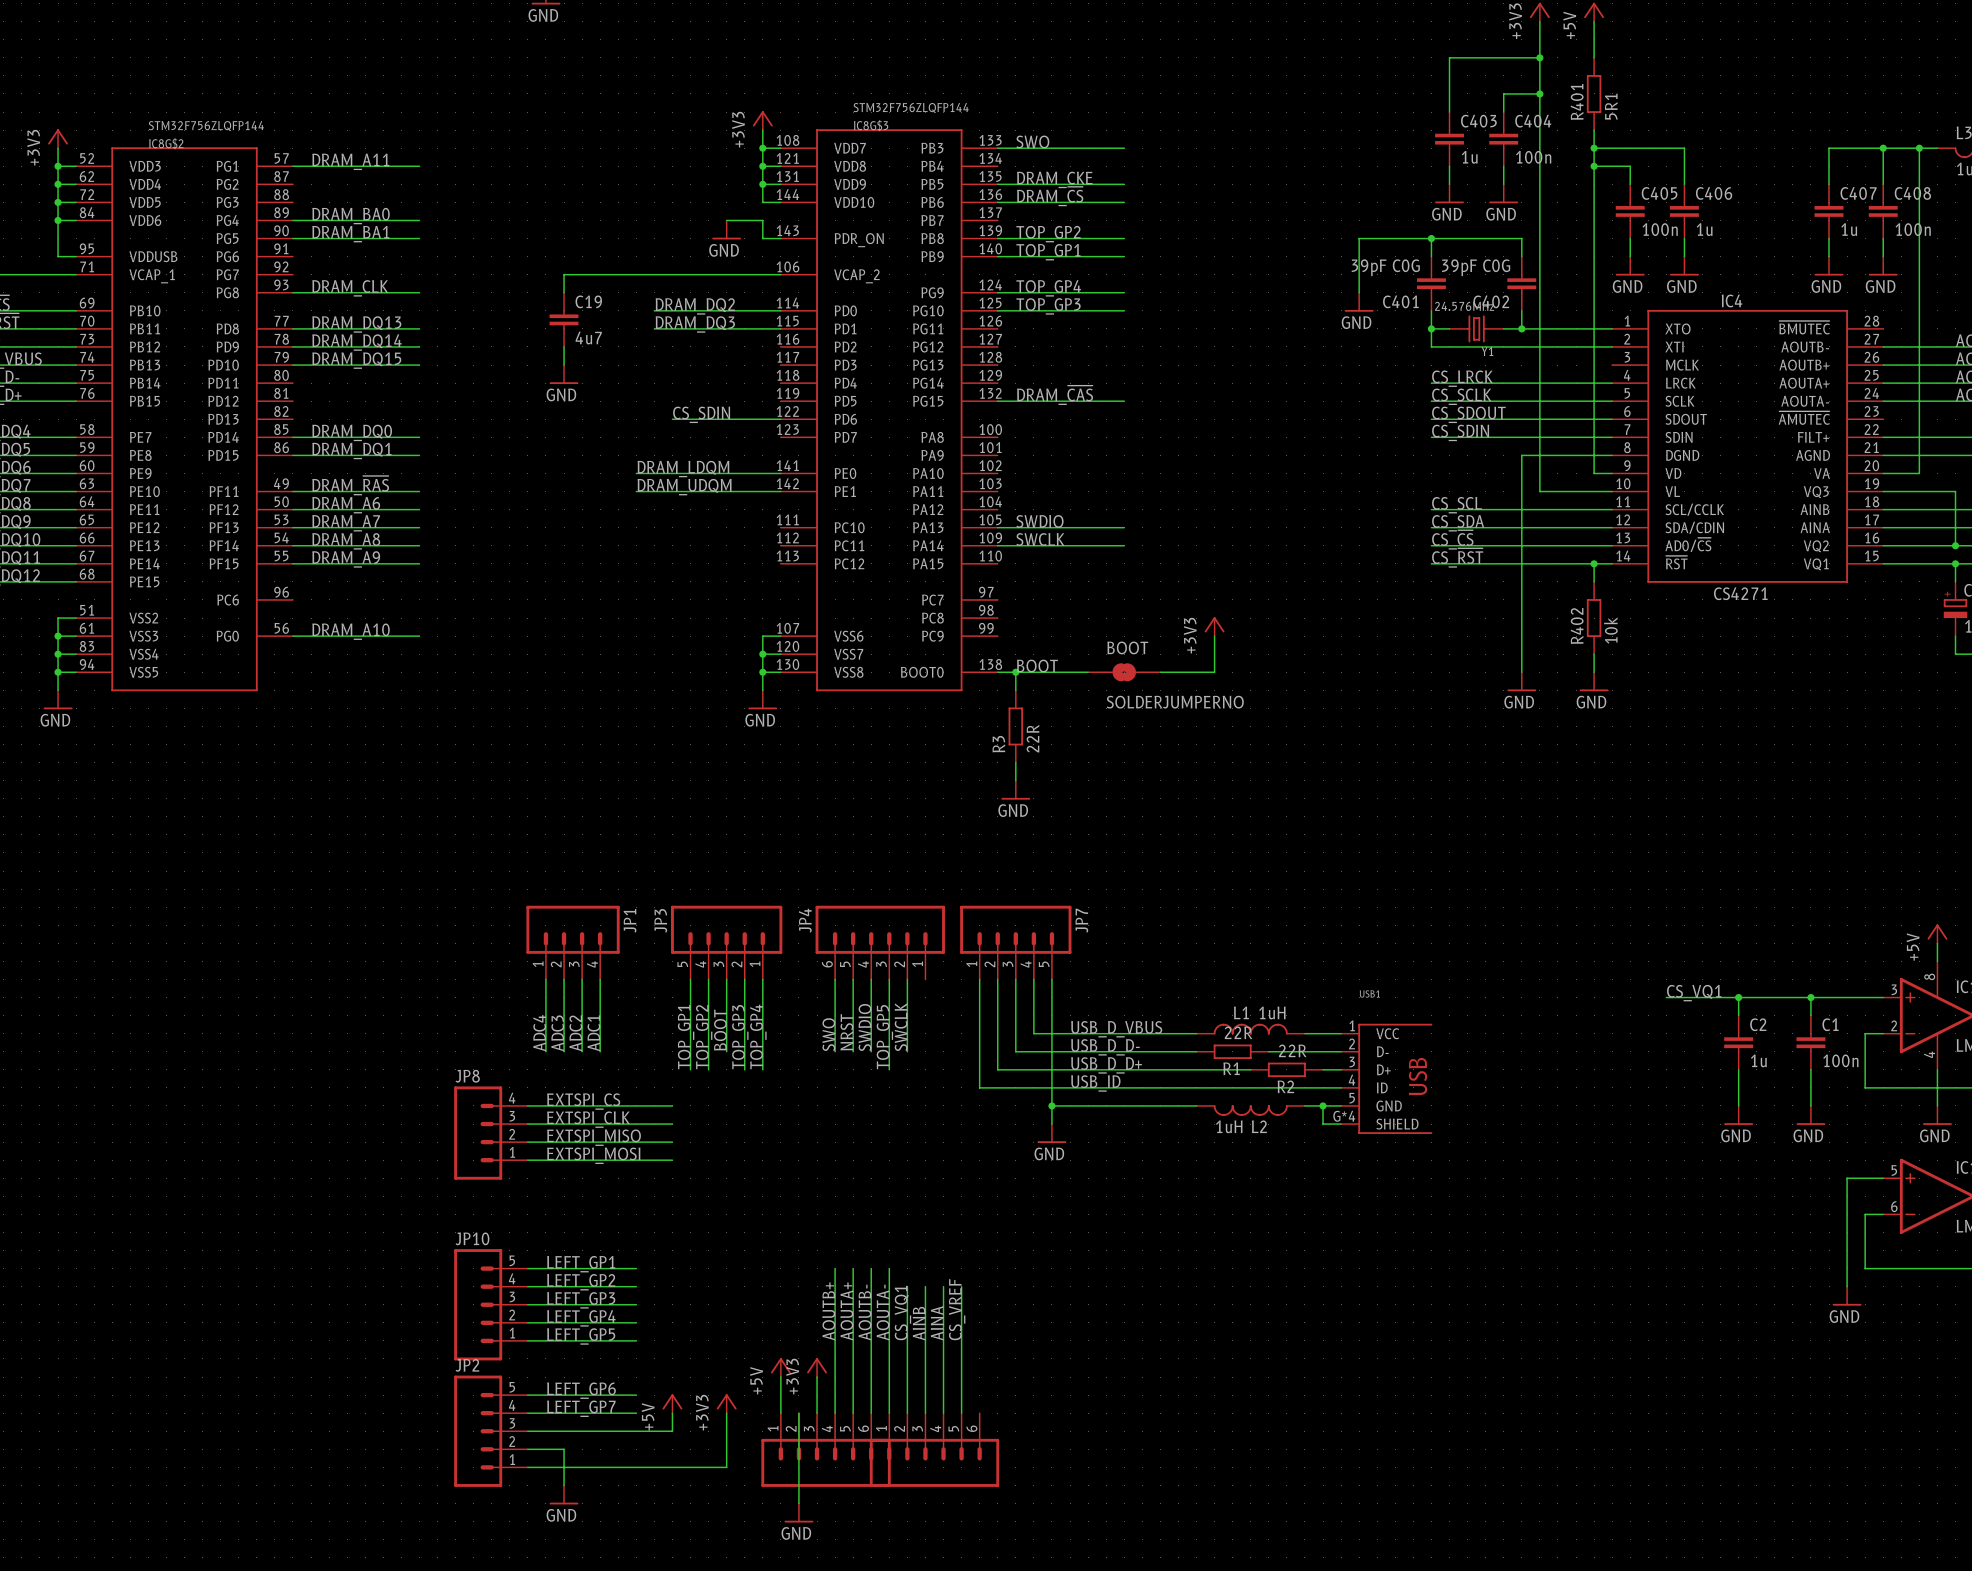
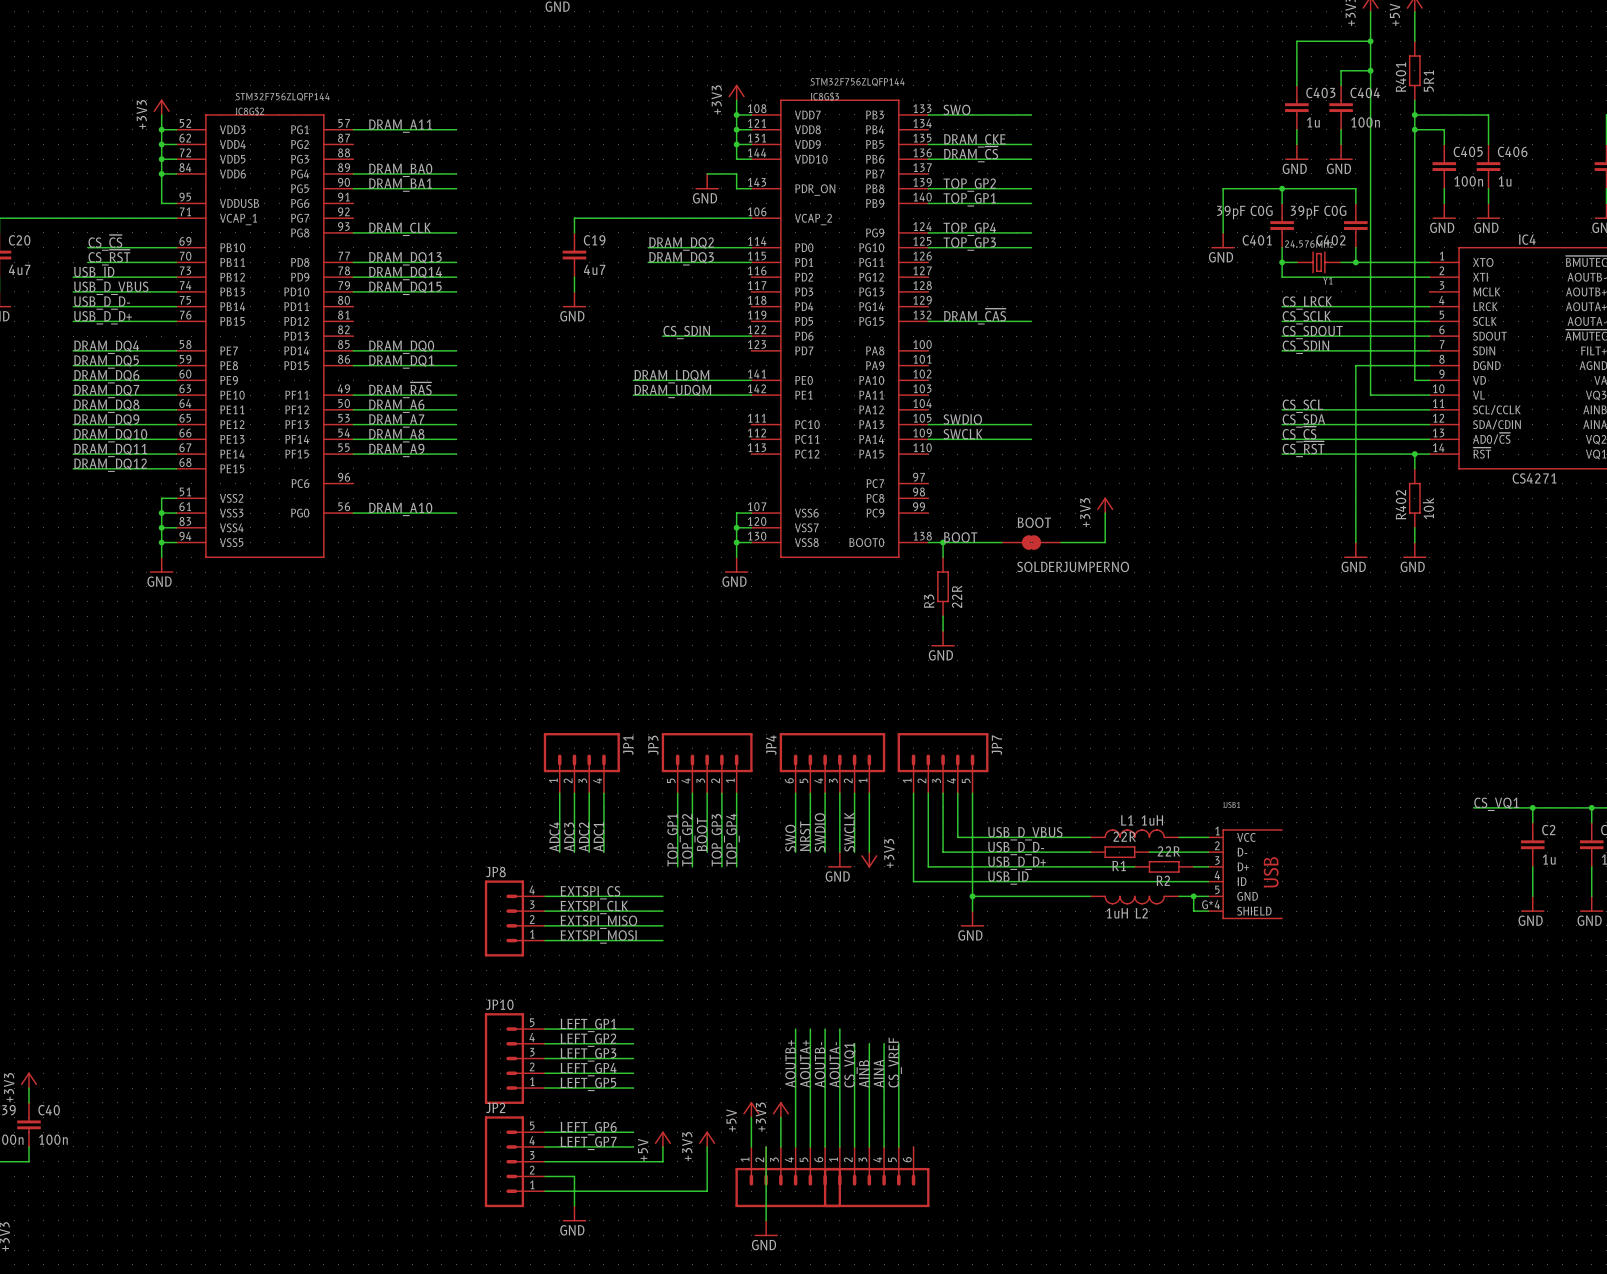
wire: none -> (869, 793) (869, 852)
label: TOP_GP5 (884, 1037) -> none
power symbol: none -> GND (839, 859)
power symbol: none -> +3V3 (869, 859)

